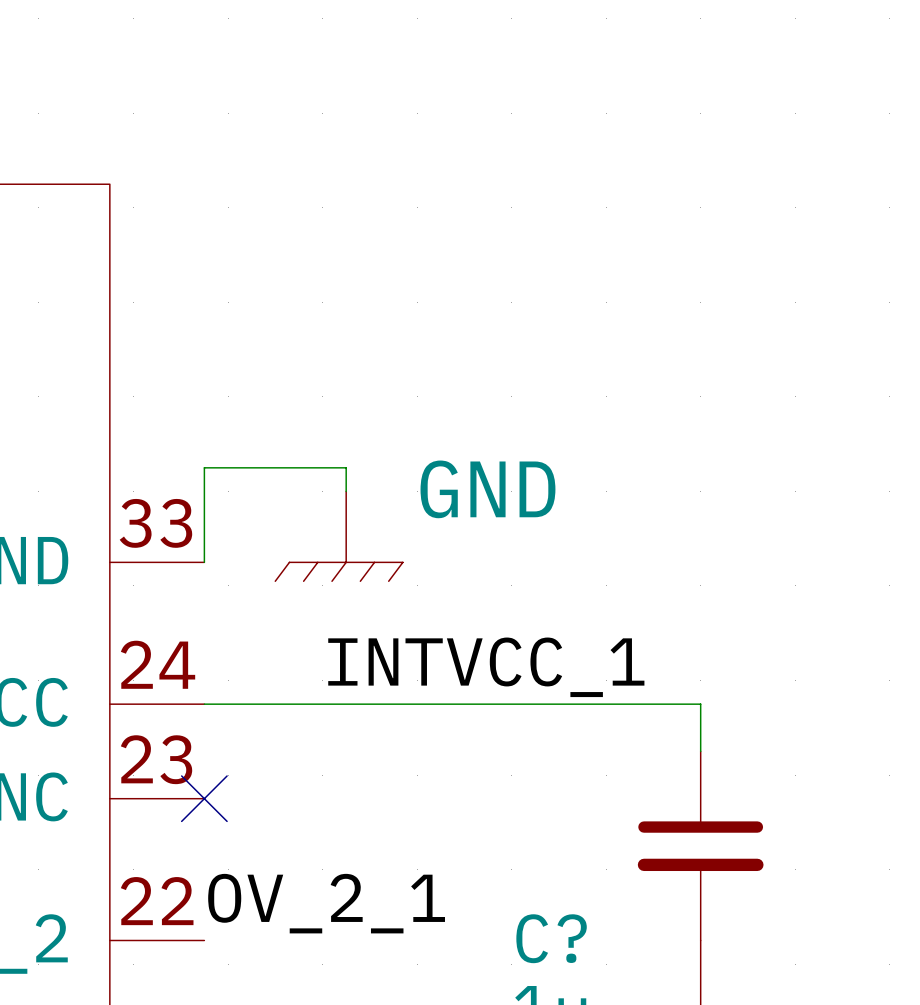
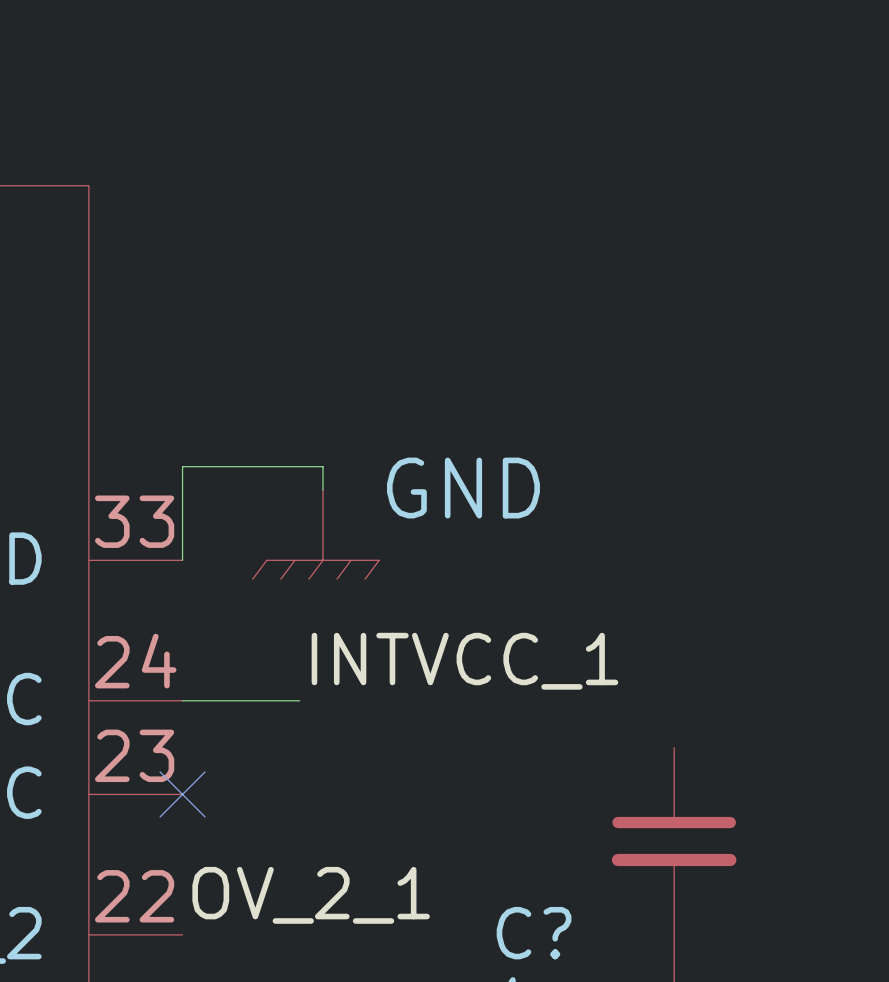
wire: (322, 704) (700, 704) (700, 751) -> none

